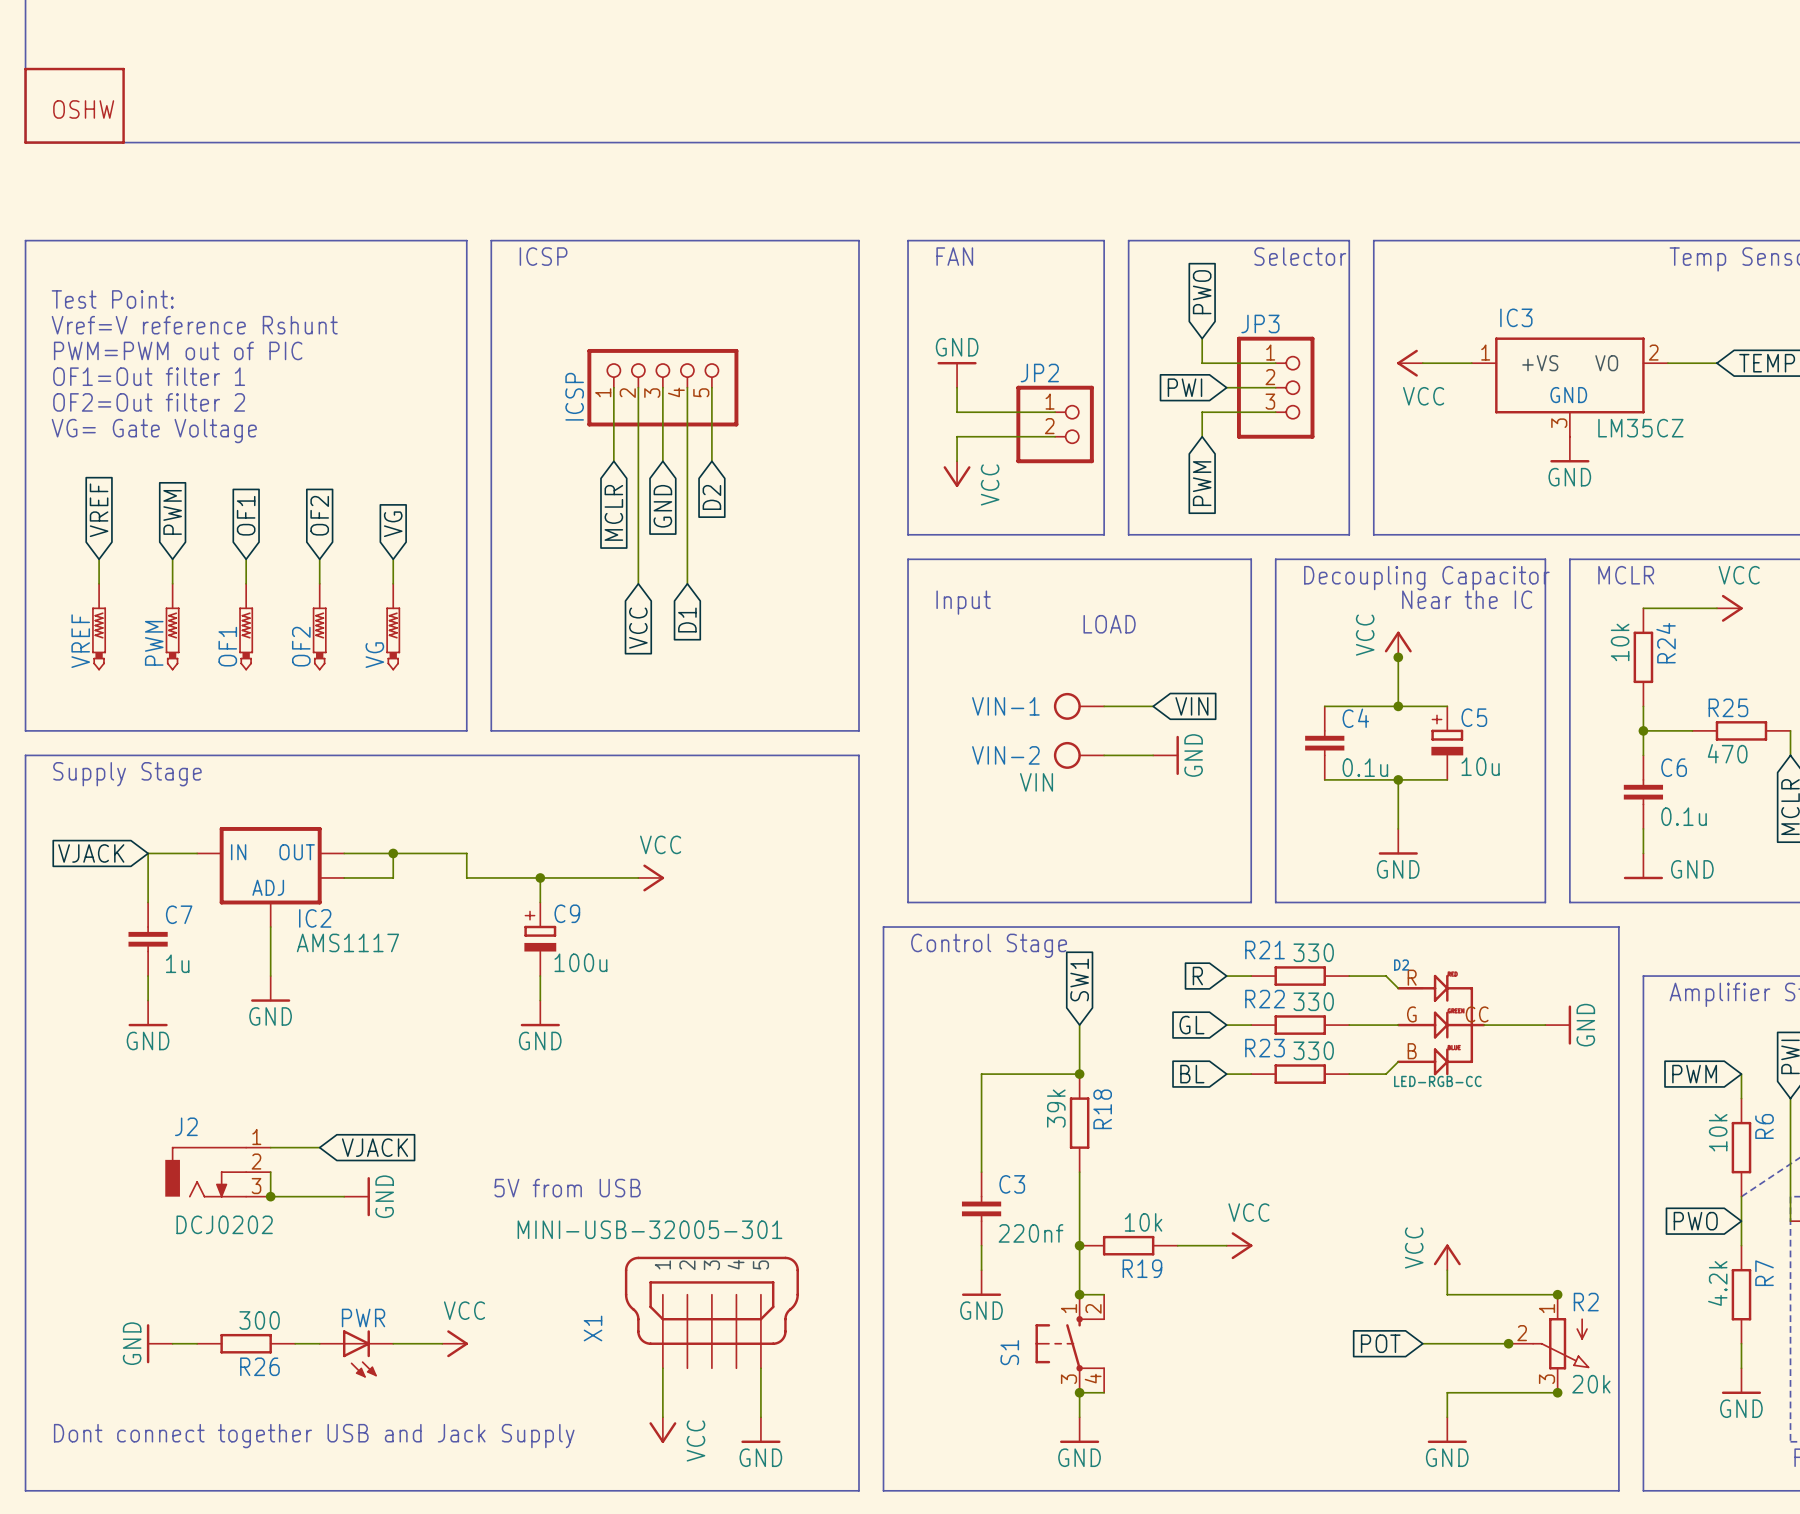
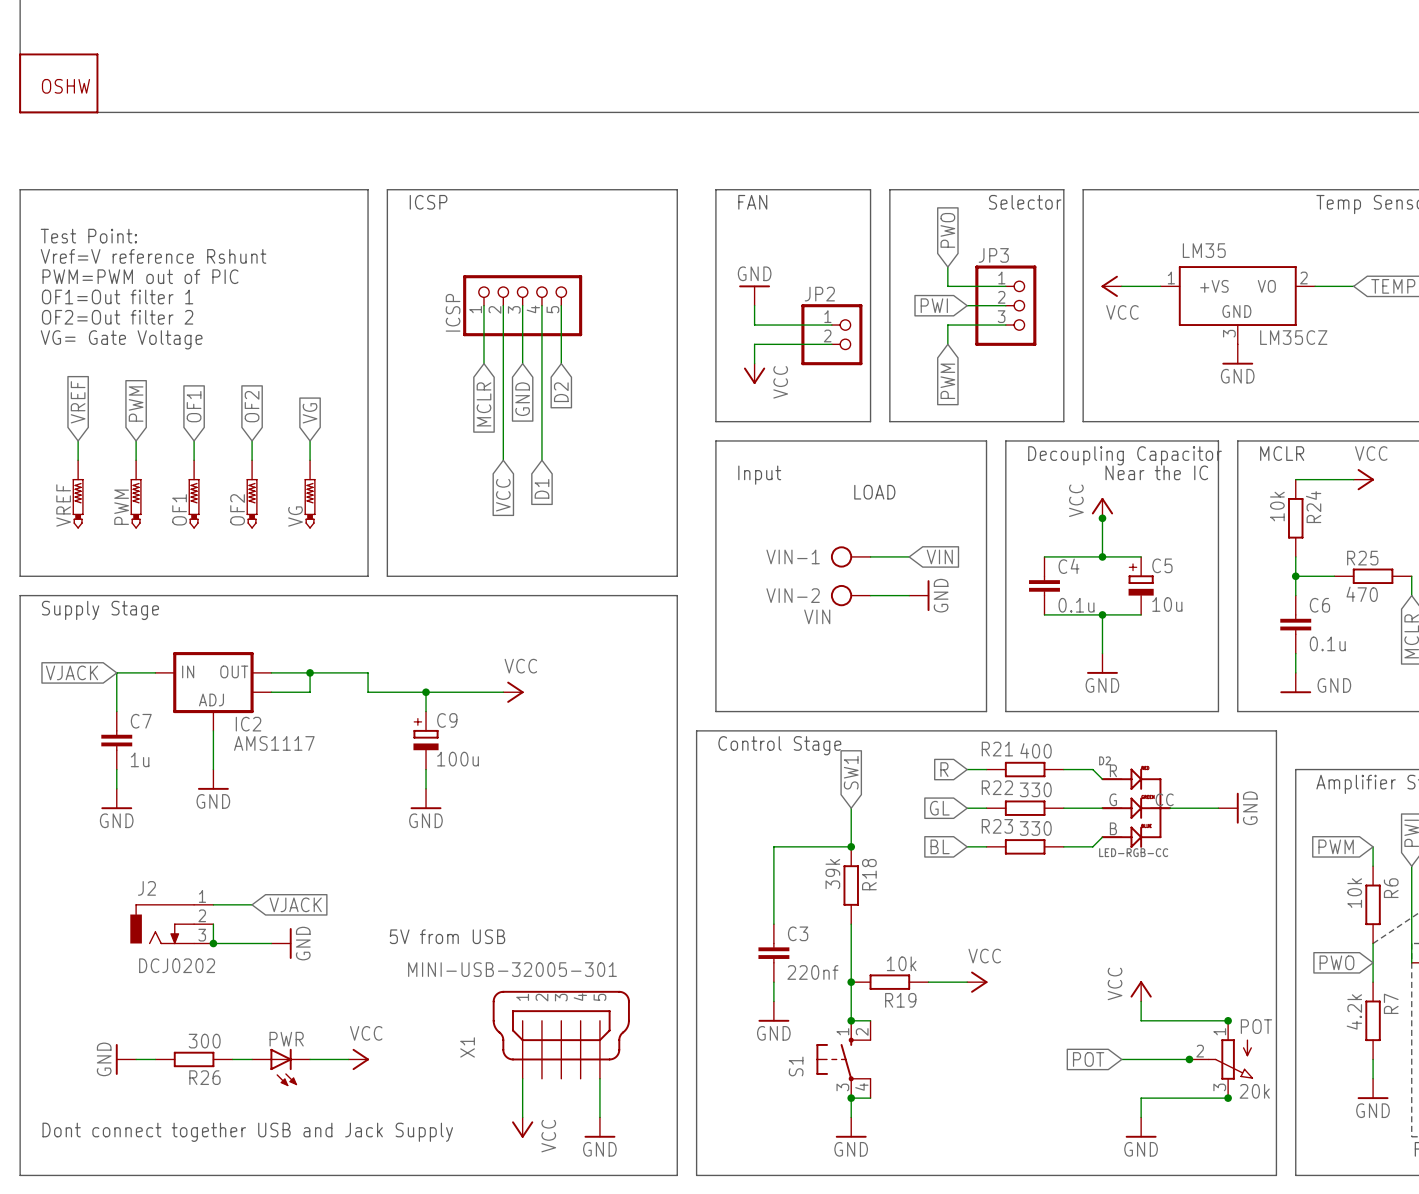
IC3 name: IC3 (1516, 317) -> LM35 (1204, 250)
R21 value: 330 (1313, 952) -> 400 (1036, 750)
R2 name: R2 (1586, 1302) -> POT (1256, 1026)

